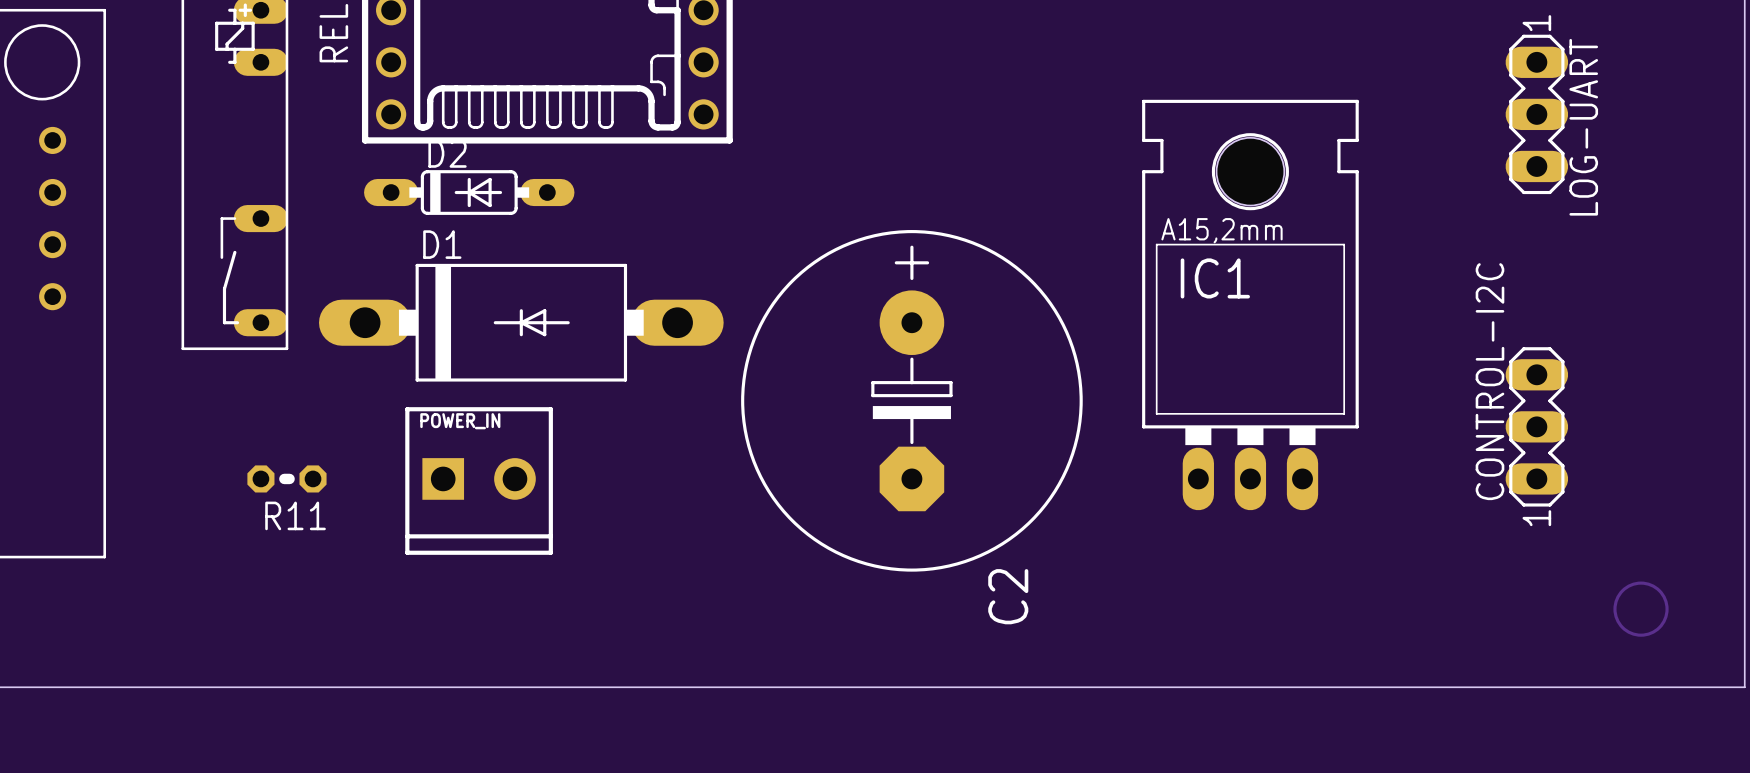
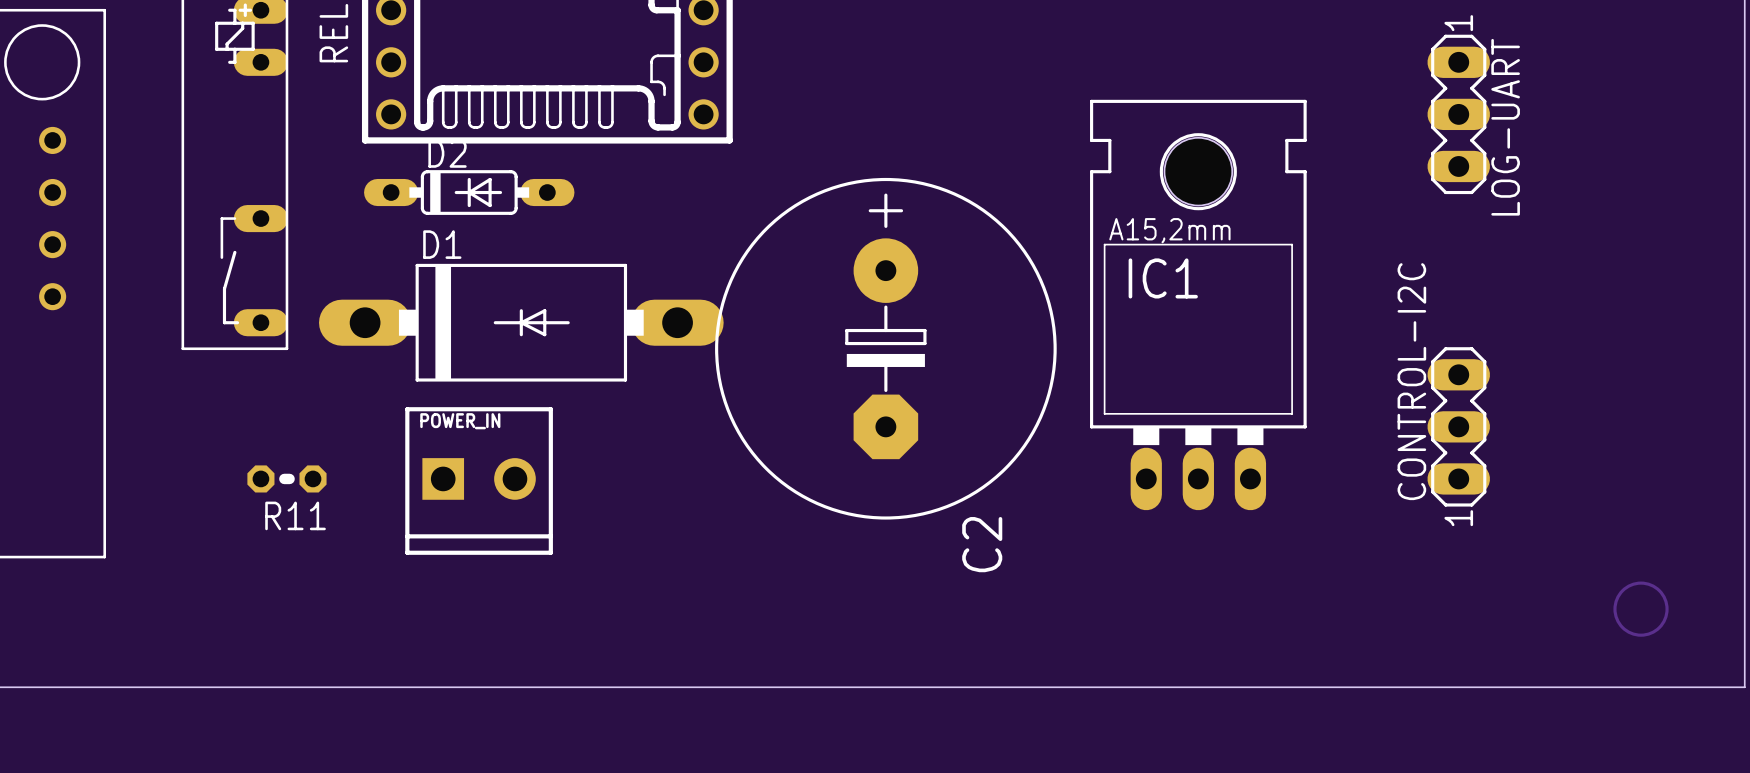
LOG-UART position: (1536, 114) -> (1458, 114)
IC1 position: (1250, 305) -> (1198, 305)
C2 position: (911, 400) -> (885, 348)
CONTROL-I2C position: (1536, 426) -> (1458, 426)

